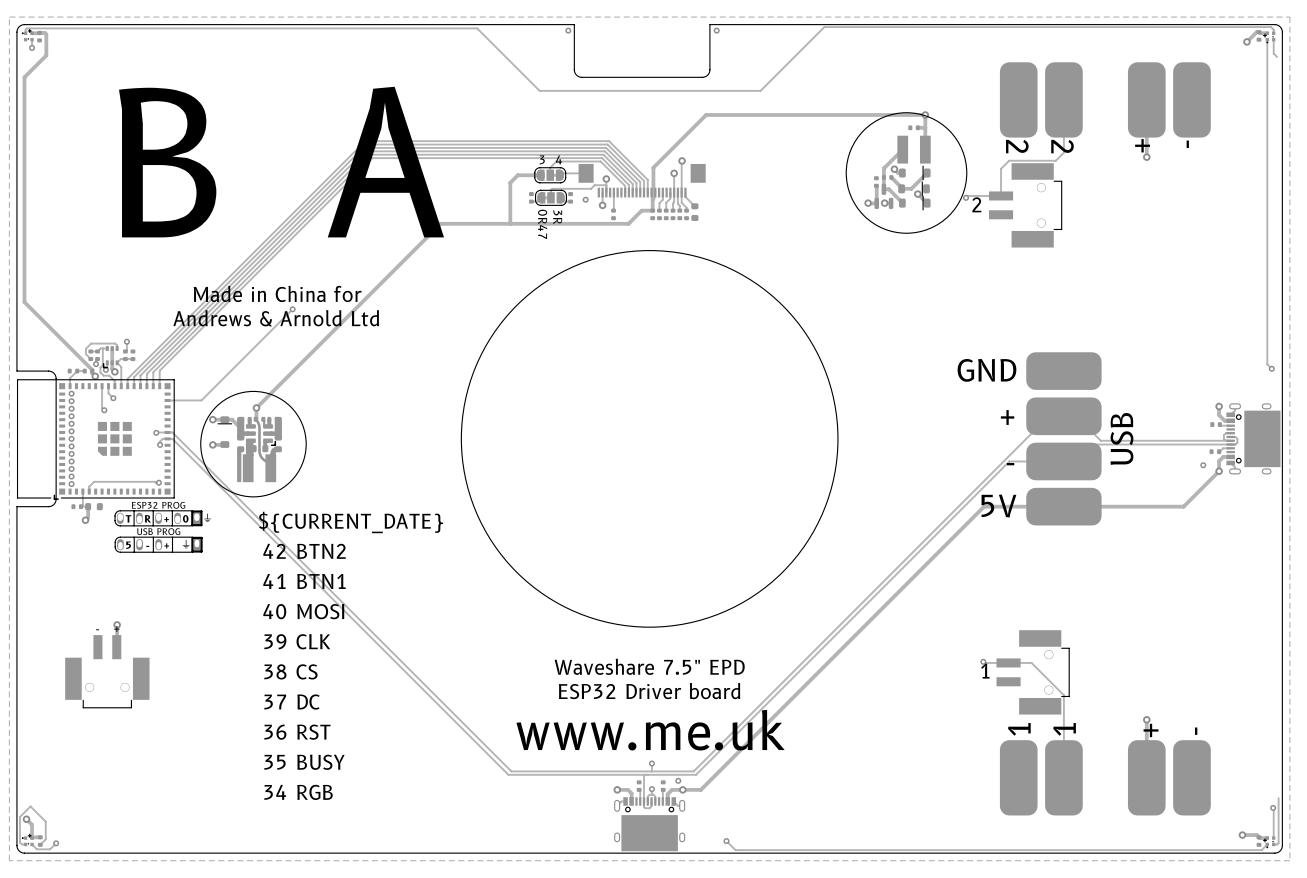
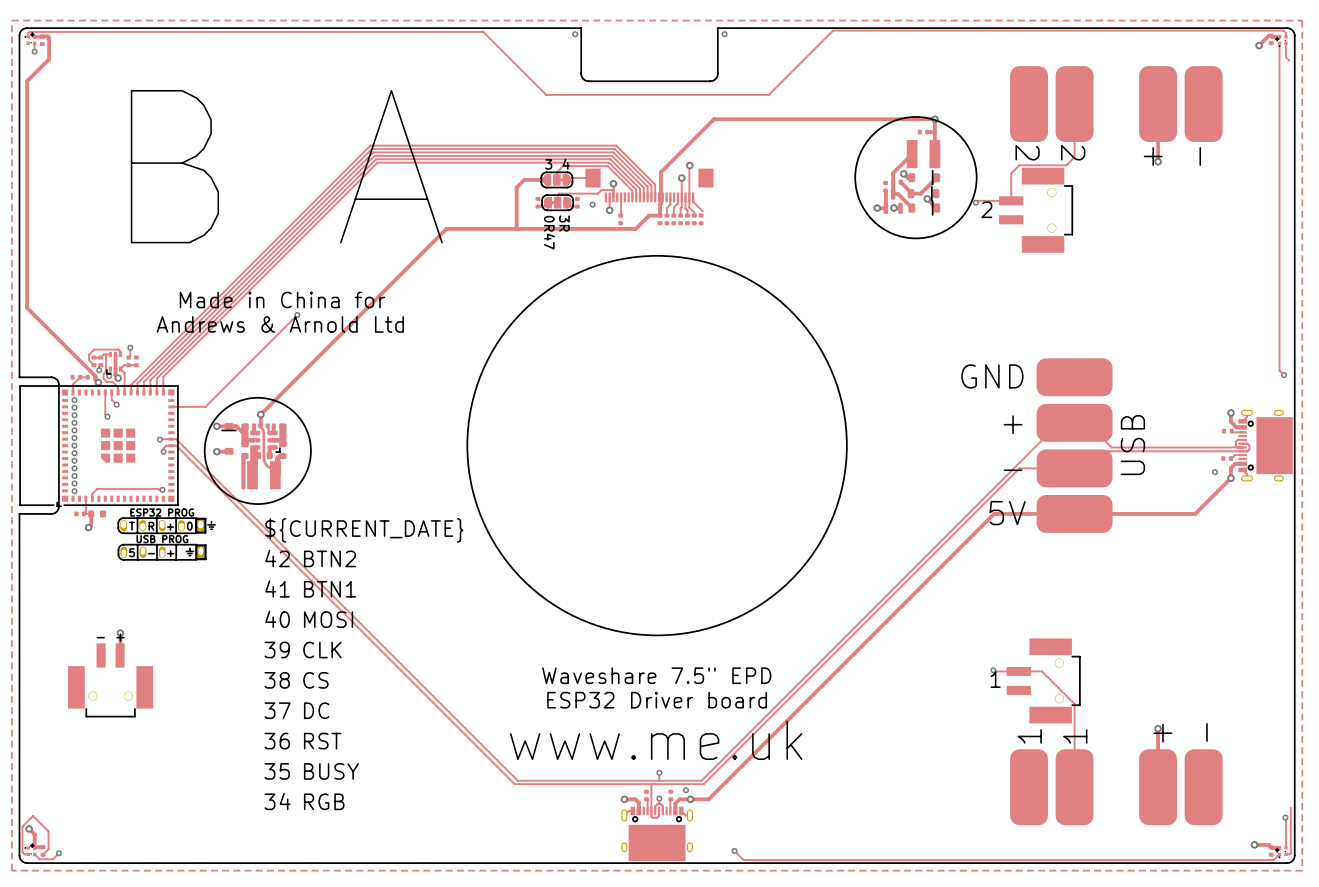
part footprint: [691, 203, 699, 222] -> [698, 213, 704, 226]

